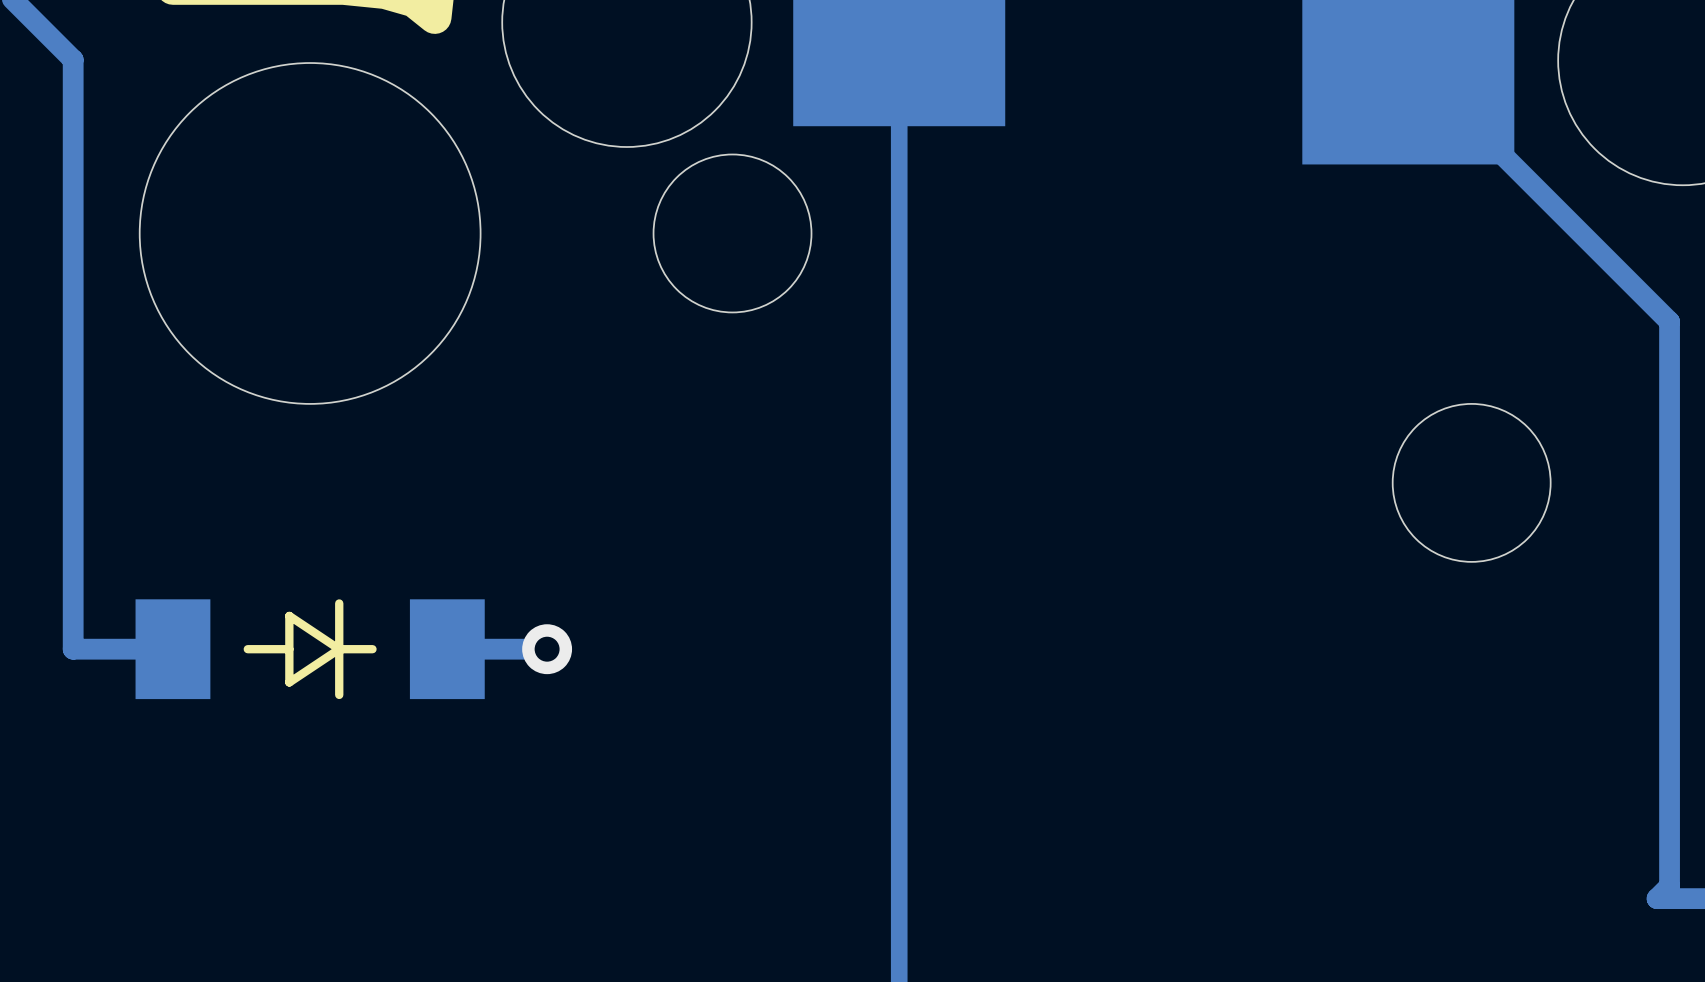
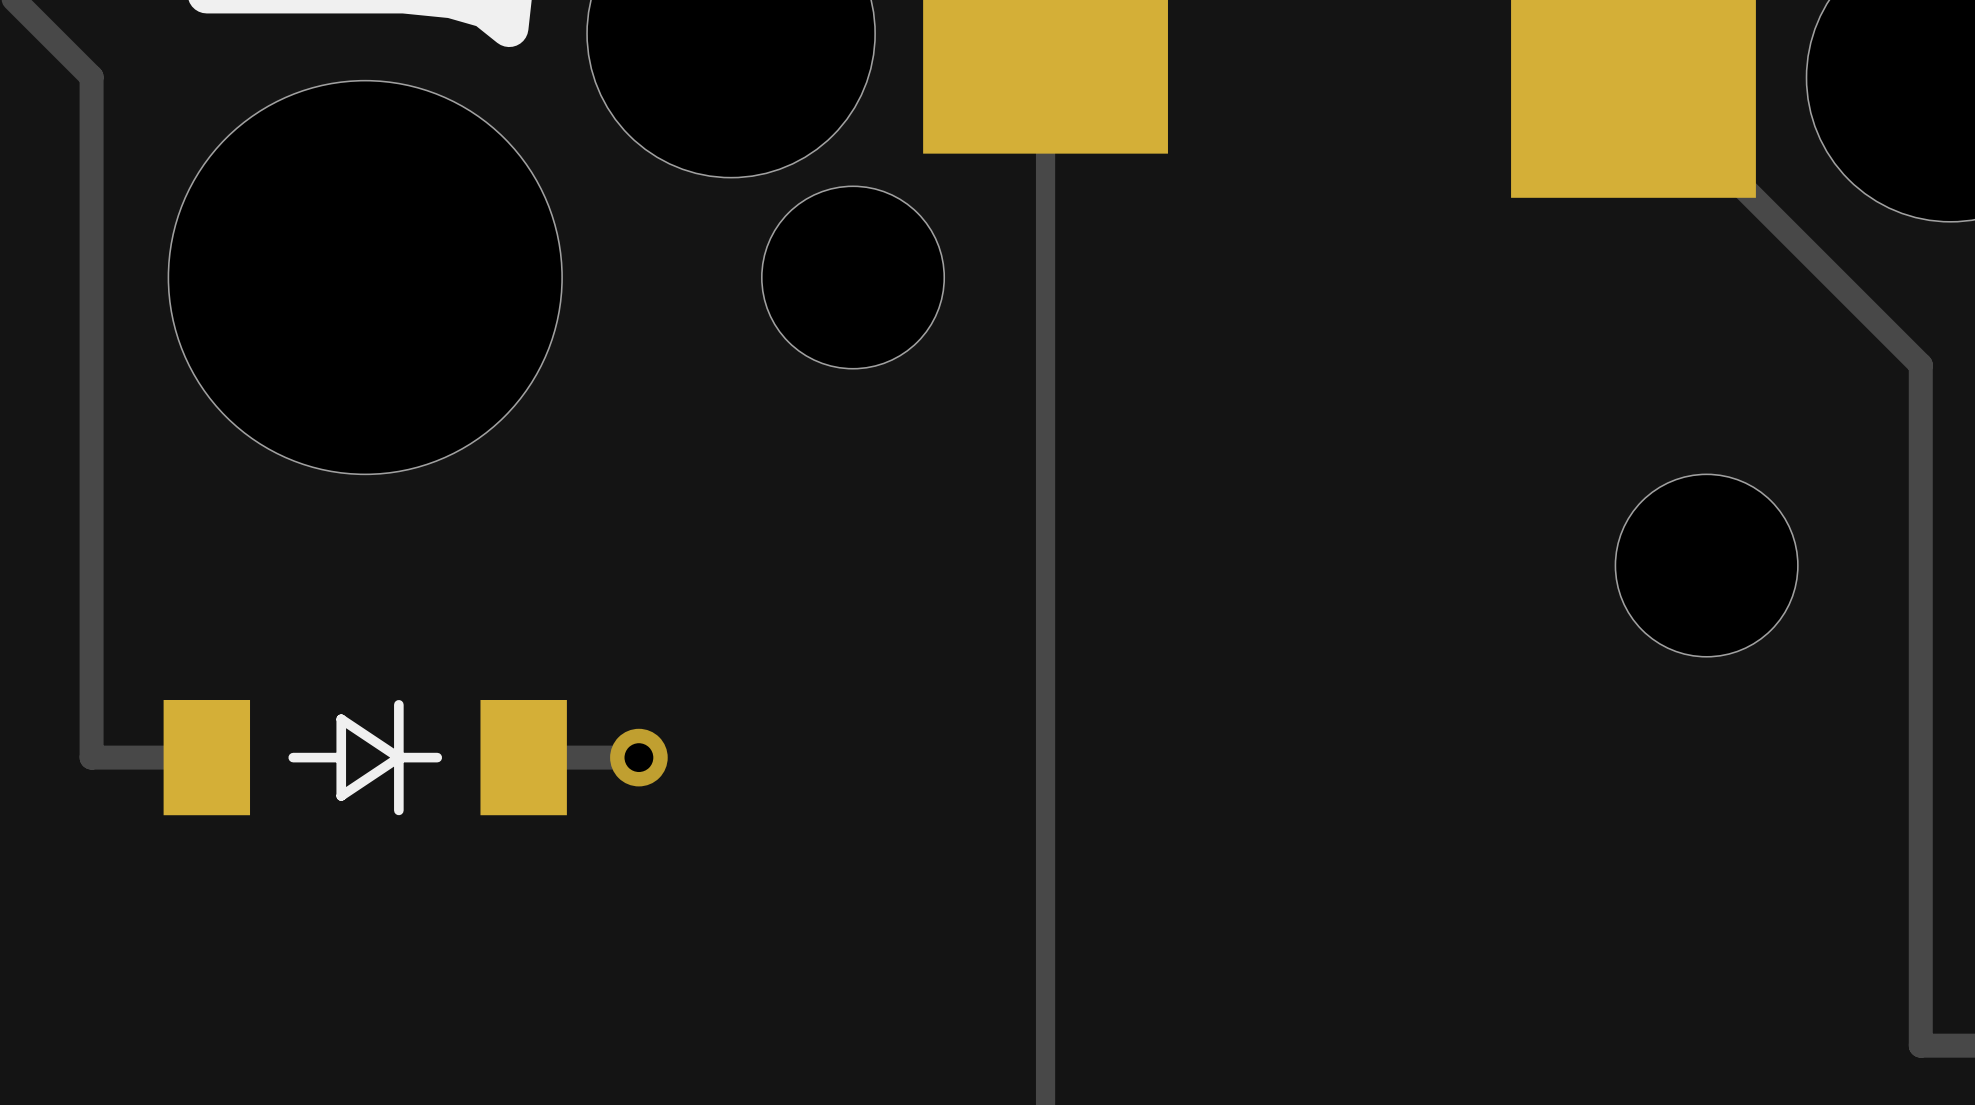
track: (1657, 309) (1669, 321) (1669, 886) (1657, 898) -> (1920, 365) (1920, 1045)

